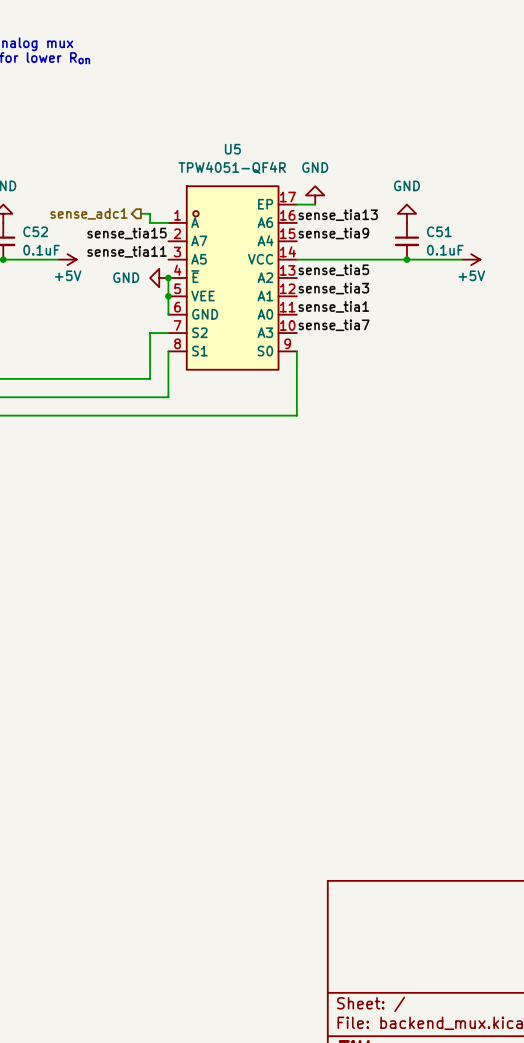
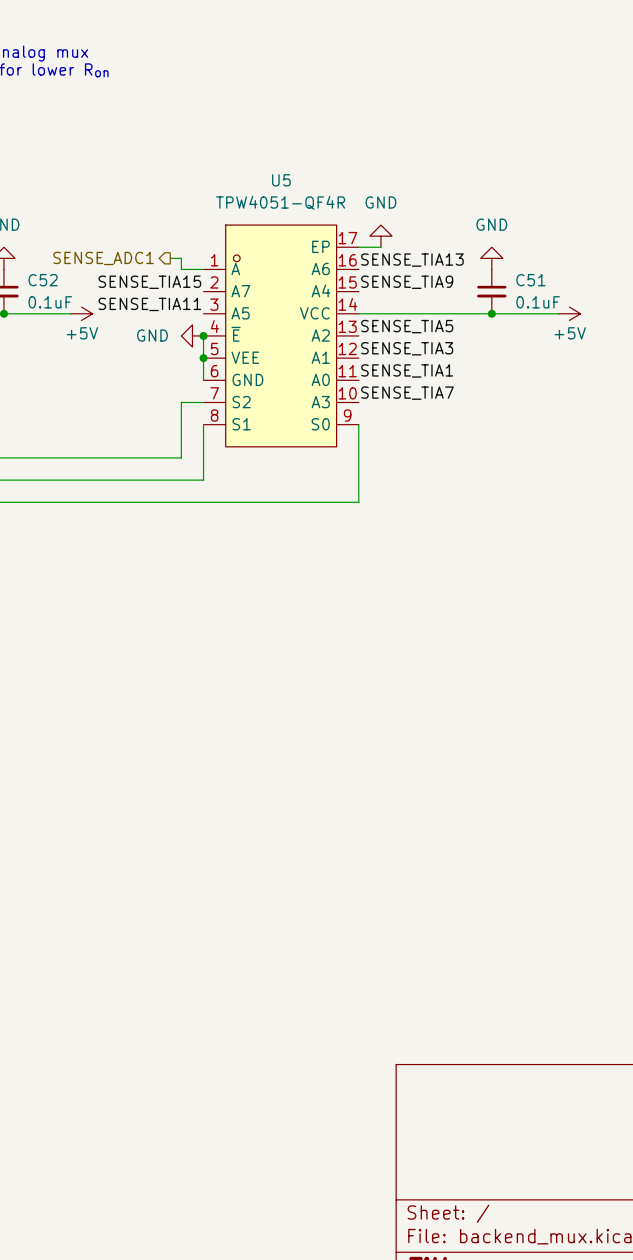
hierarchical label: sense_adc1 (88, 213) -> SENSE_ADC1 (103, 258)
label: sense_tia13 (338, 215) -> SENSE_TIA13 (412, 260)
label: sense_tia15 (127, 233) -> SENSE_TIA15 (149, 282)
label: sense_tia9 (333, 233) -> SENSE_TIA9 (407, 282)
label: sense_tia11 (127, 251) -> SENSE_TIA11 (149, 304)
label: sense_tia5 (333, 270) -> SENSE_TIA5 (407, 326)
label: sense_tia3 (333, 288) -> SENSE_TIA3 (407, 348)
label: sense_tia1 (333, 306) -> SENSE_TIA1 (407, 370)
label: sense_tia7 (334, 325) -> SENSE_TIA7 (407, 393)

